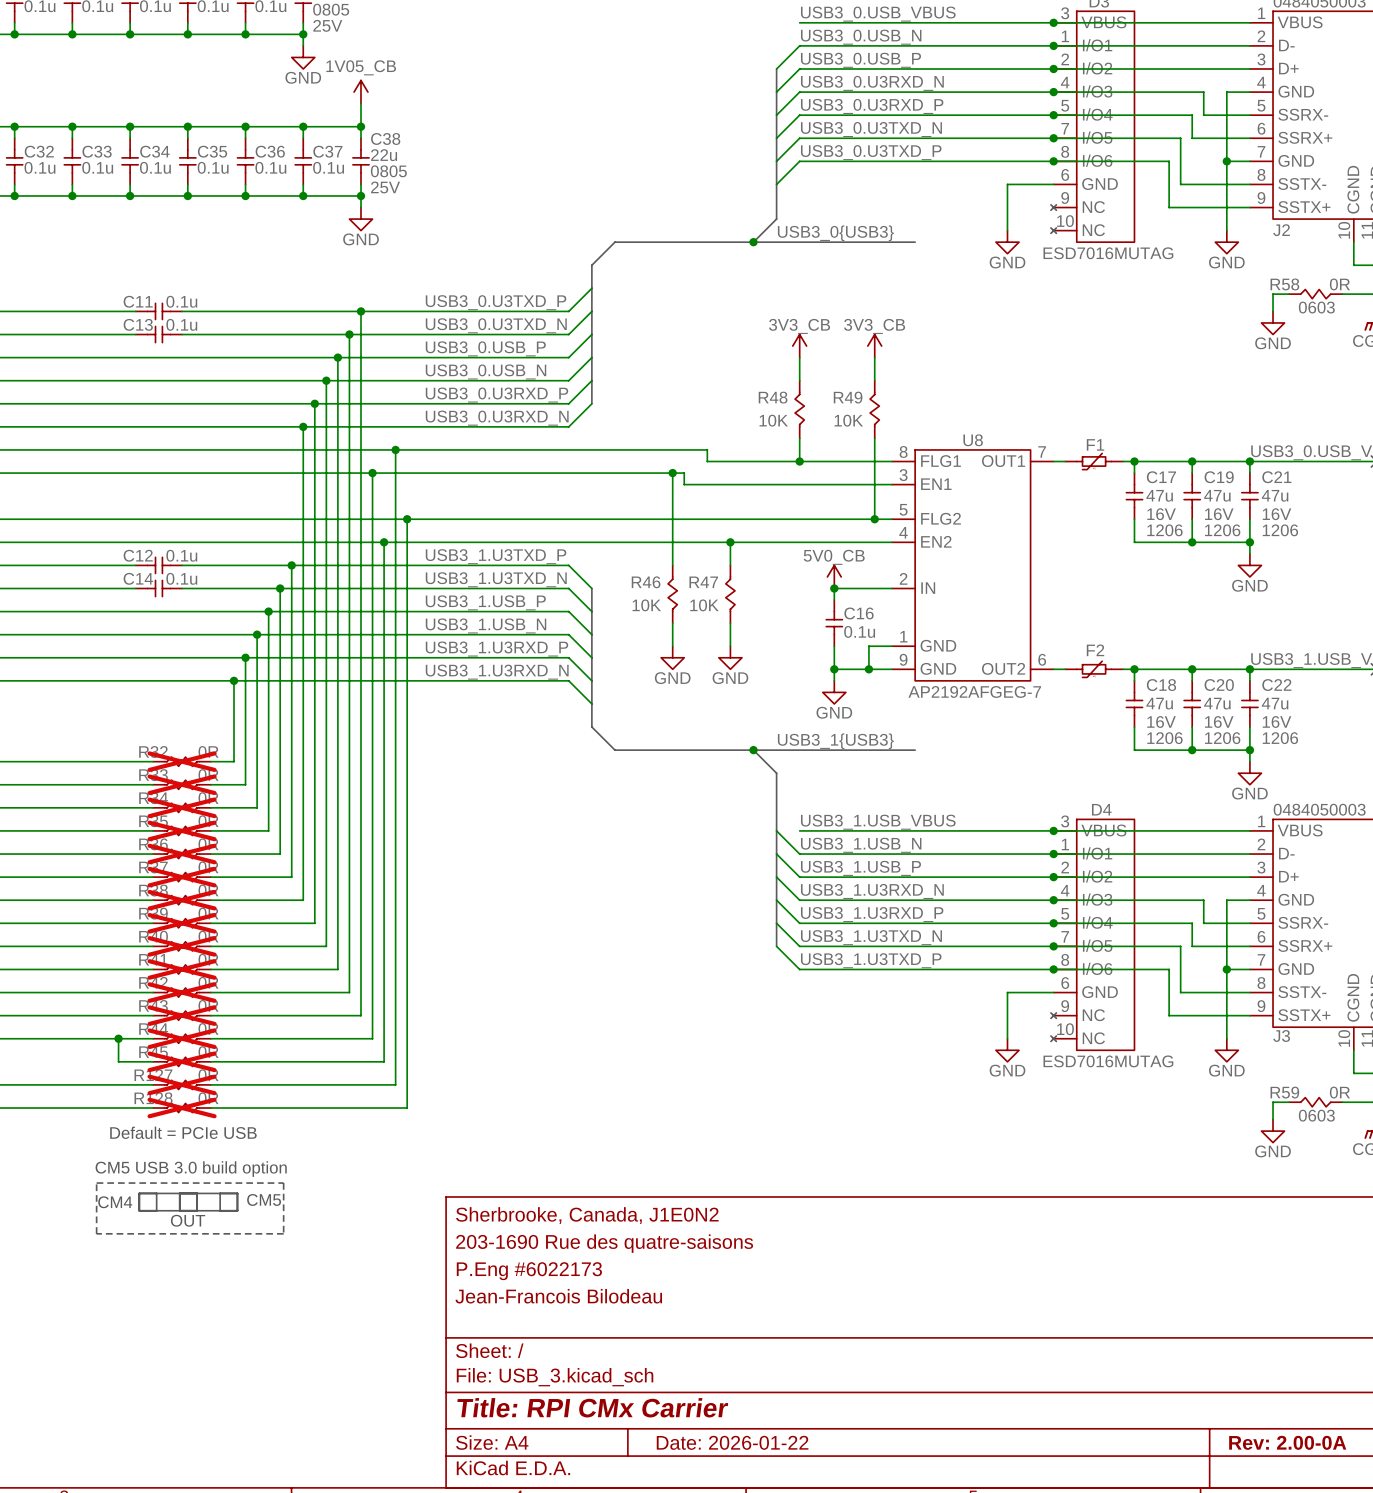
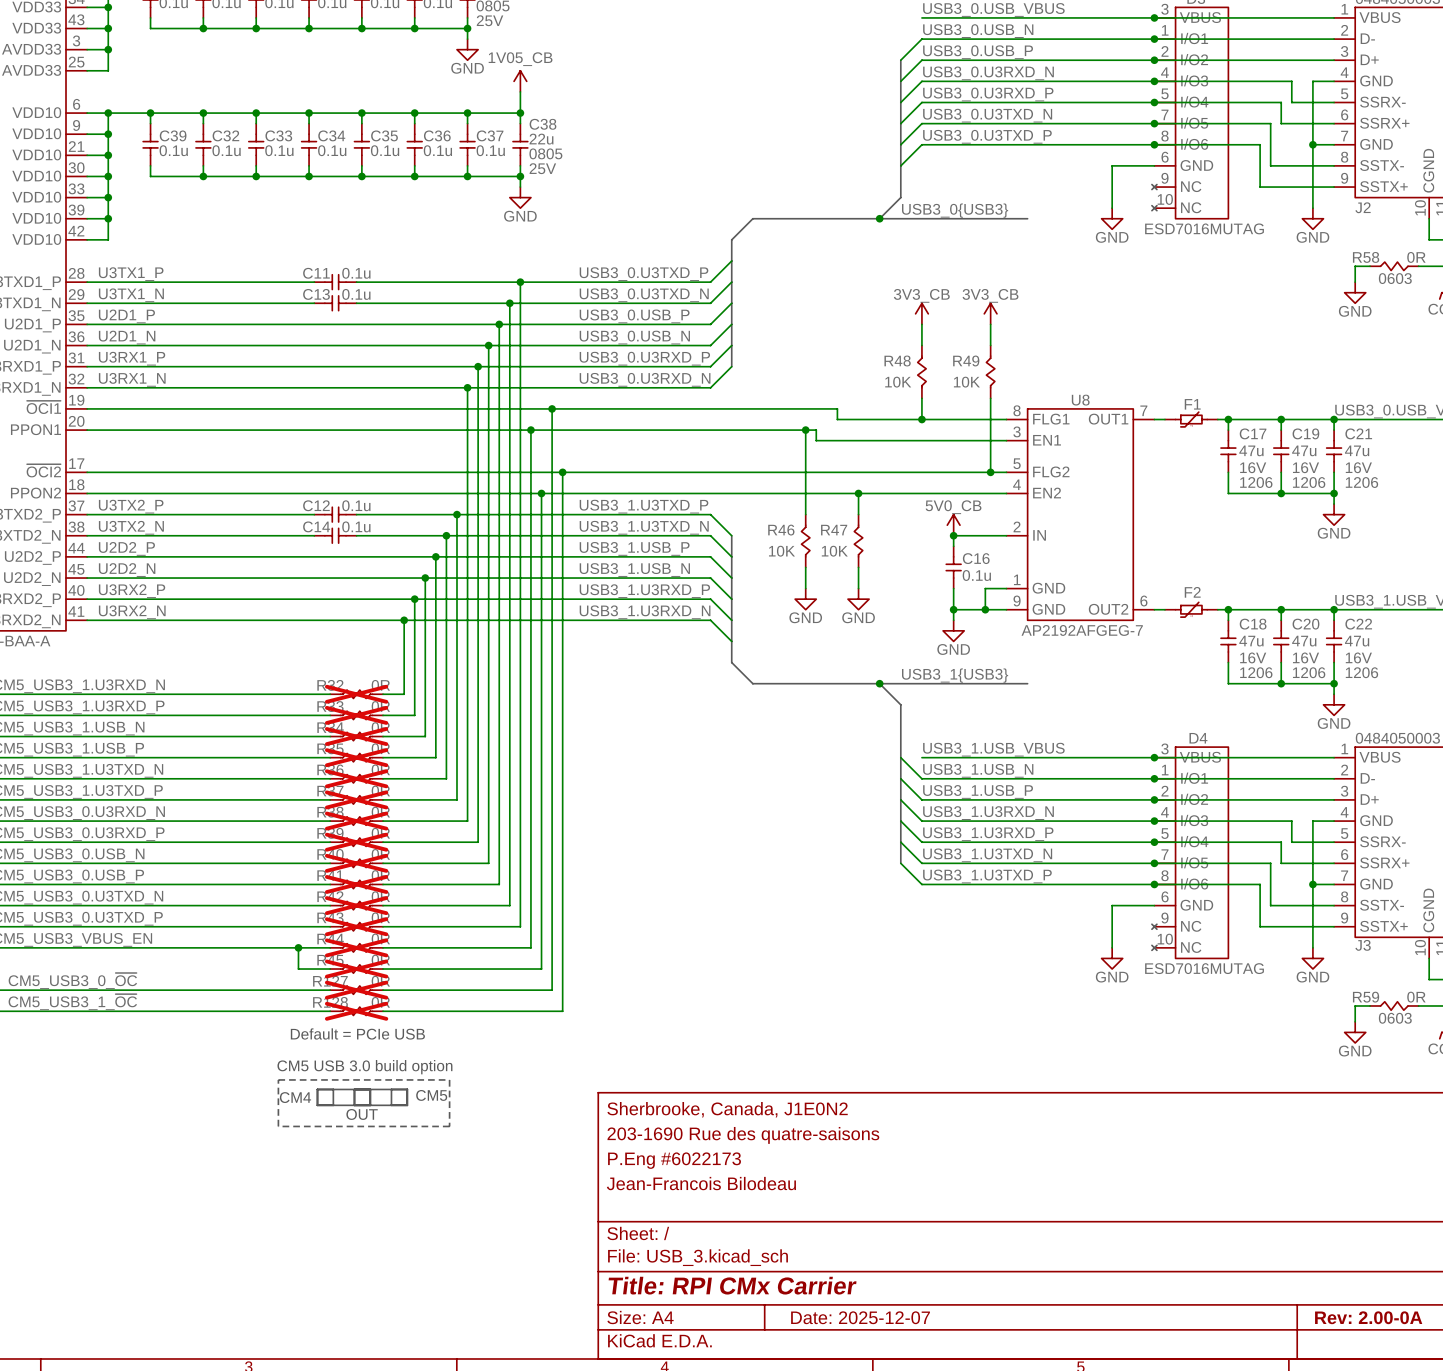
title block: Date: 2026-01-22 (732, 1442) -> Date: 2025-12-07 (860, 1317)

